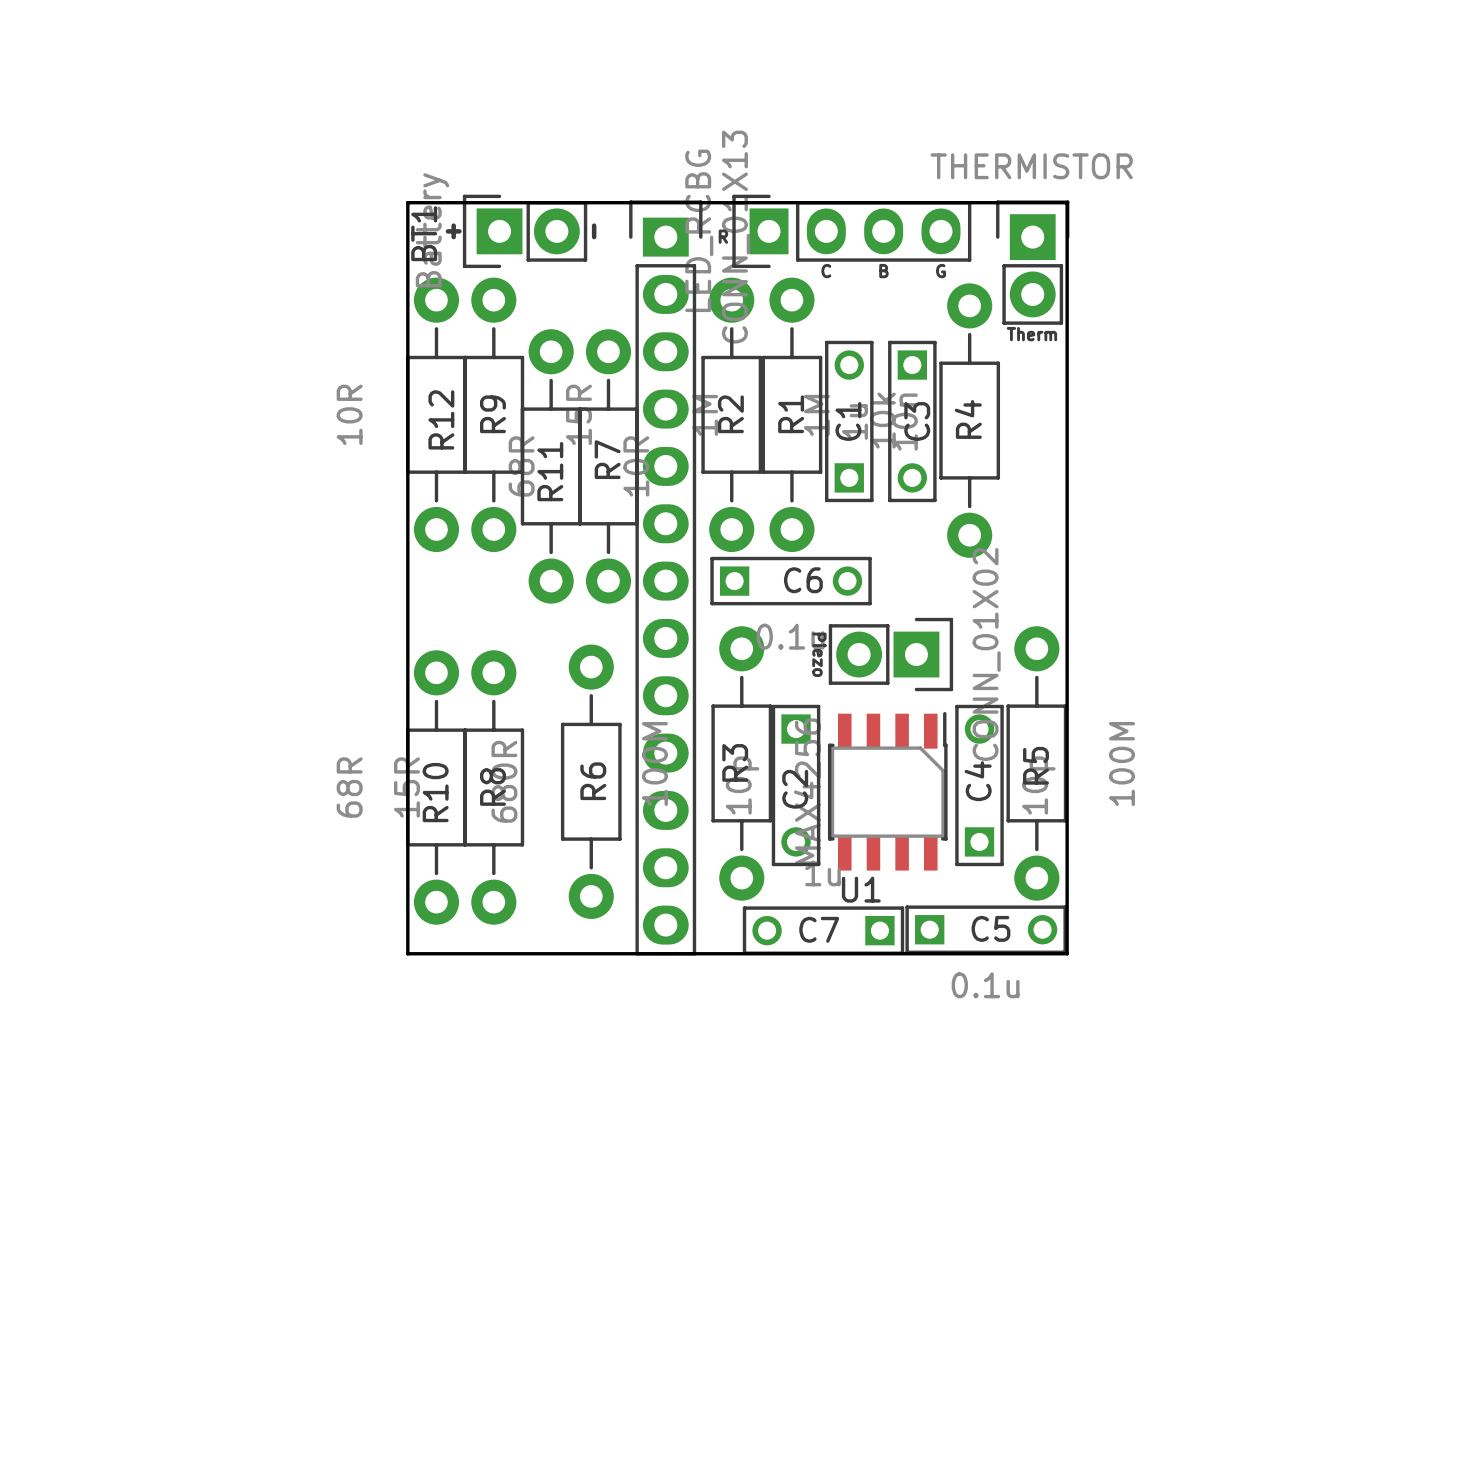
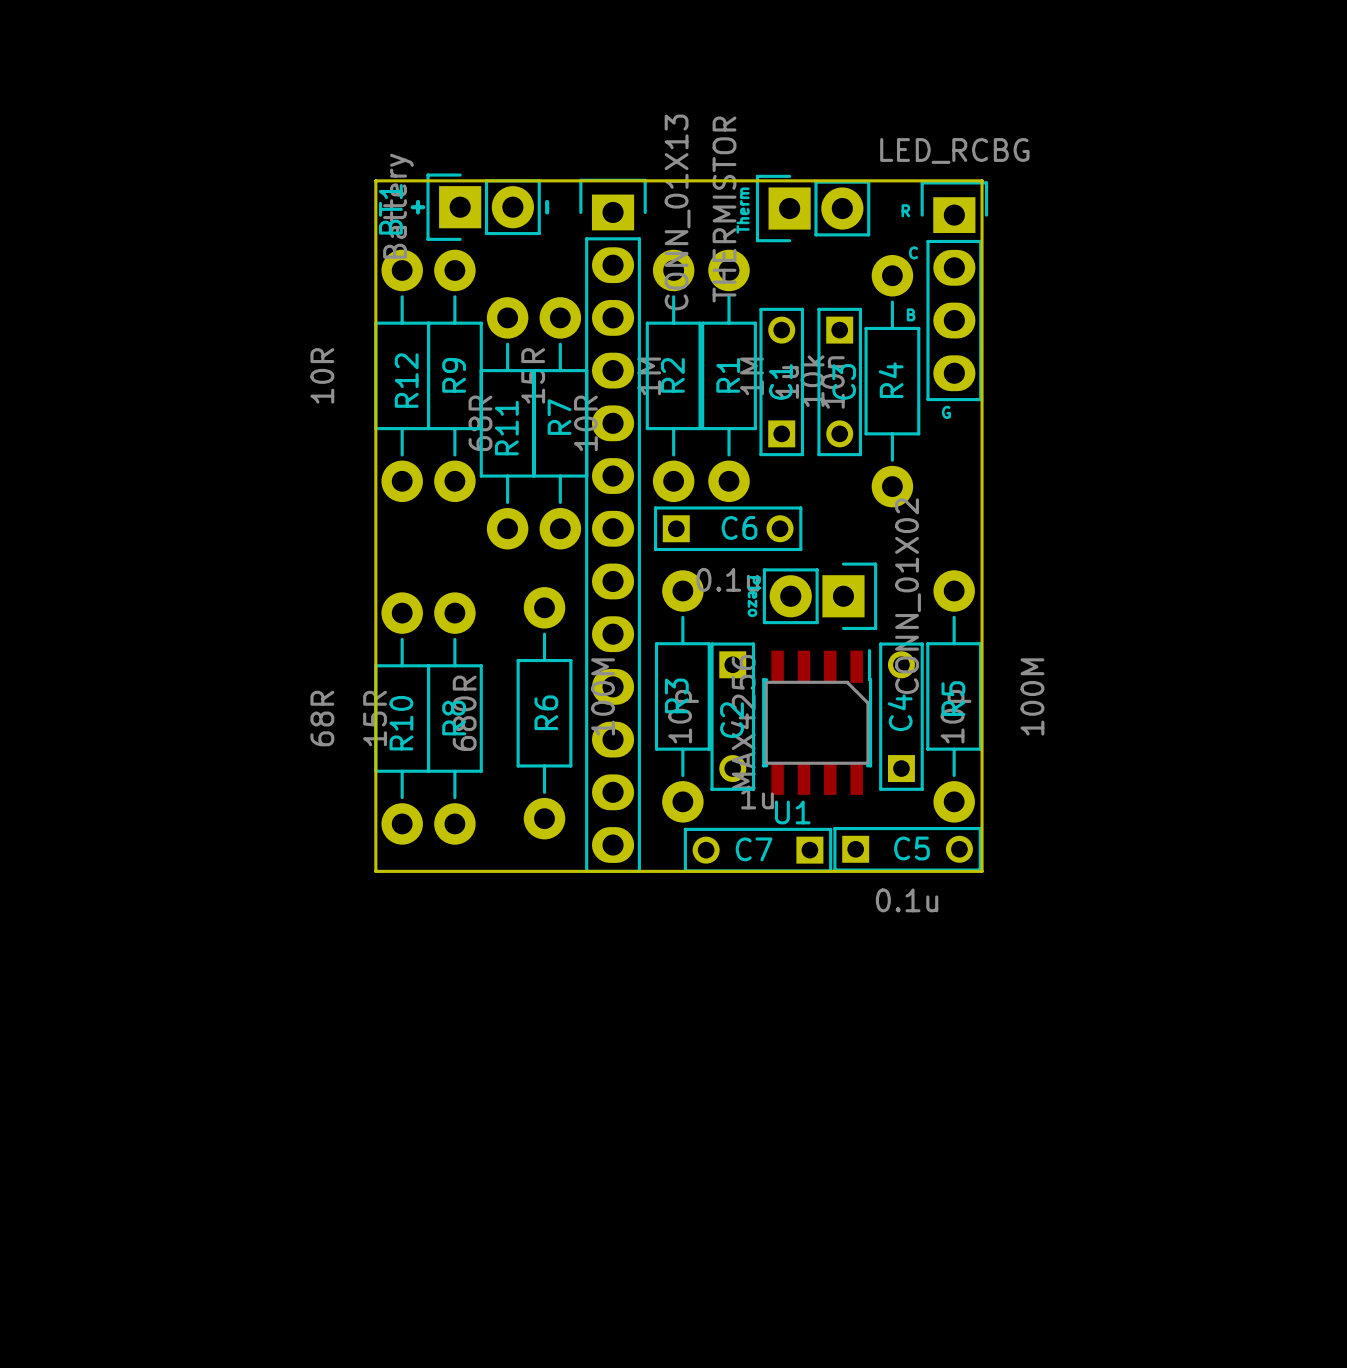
part rotation: 0° (851, 231) -> 90° clockwise (954, 291)
part position: (851, 231) -> (954, 291)
text position: R (723, 236) -> R (905, 210)
part rotation: 0° (1032, 262) -> 90° counterclockwise (813, 208)
part position: (1032, 262) -> (813, 208)
text position: C (826, 271) -> C (913, 252)
text position: B (883, 271) -> B (911, 314)
text position: G (941, 271) -> G (946, 412)
text rotation: 0° (1031, 334) -> 90° counterclockwise (743, 210)
text position: Therm (1031, 334) -> Therm (743, 210)

